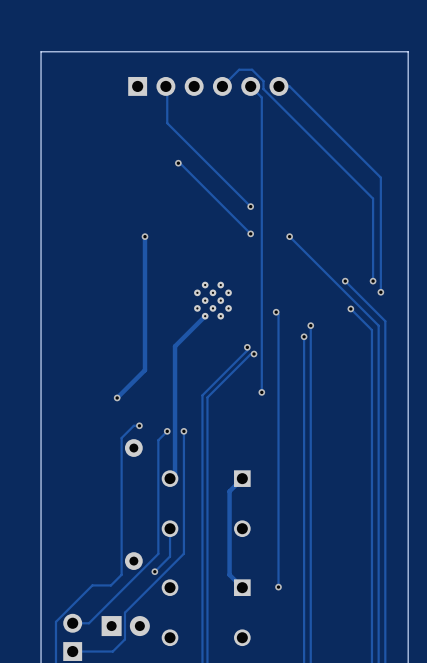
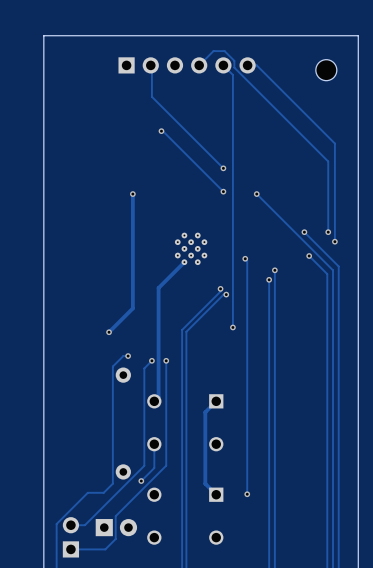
part: none -> (326, 70)

